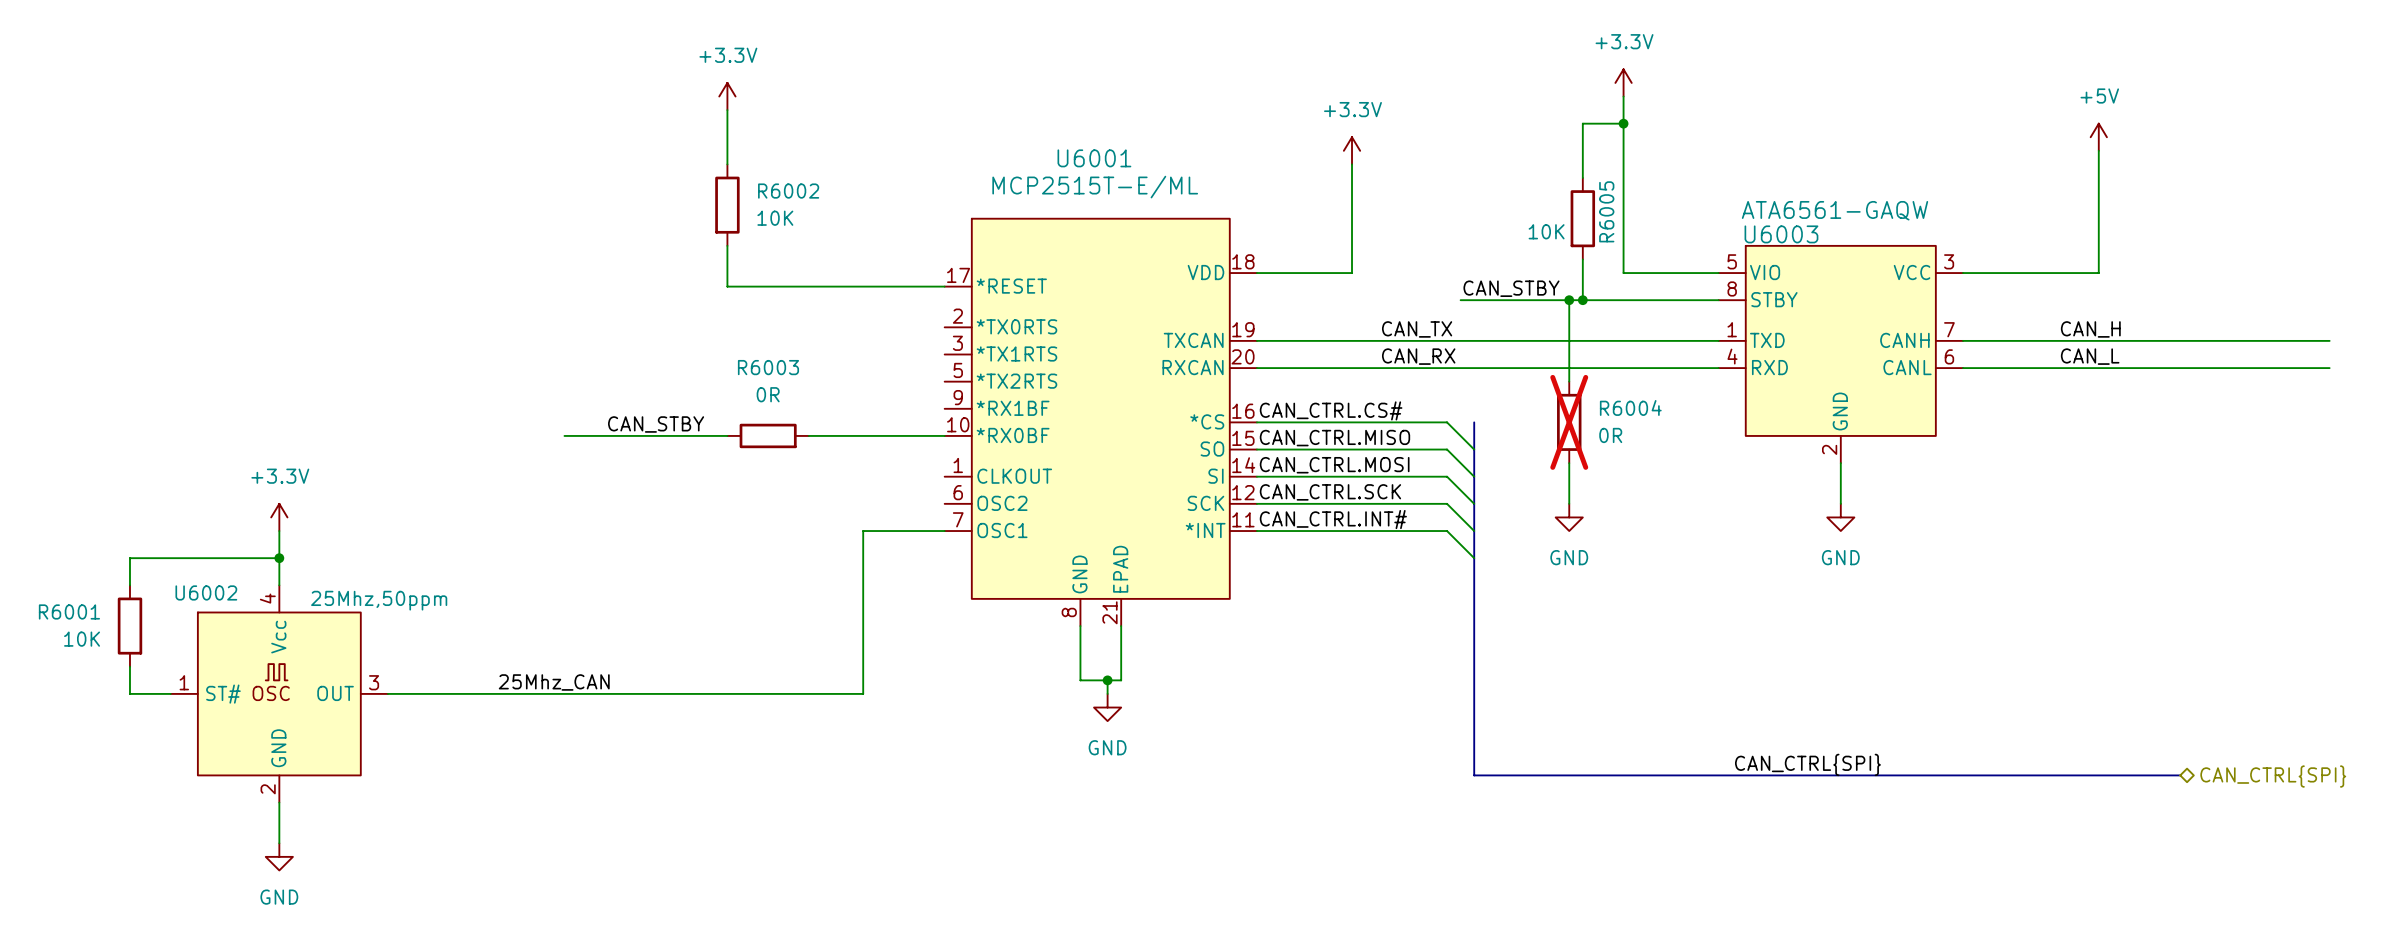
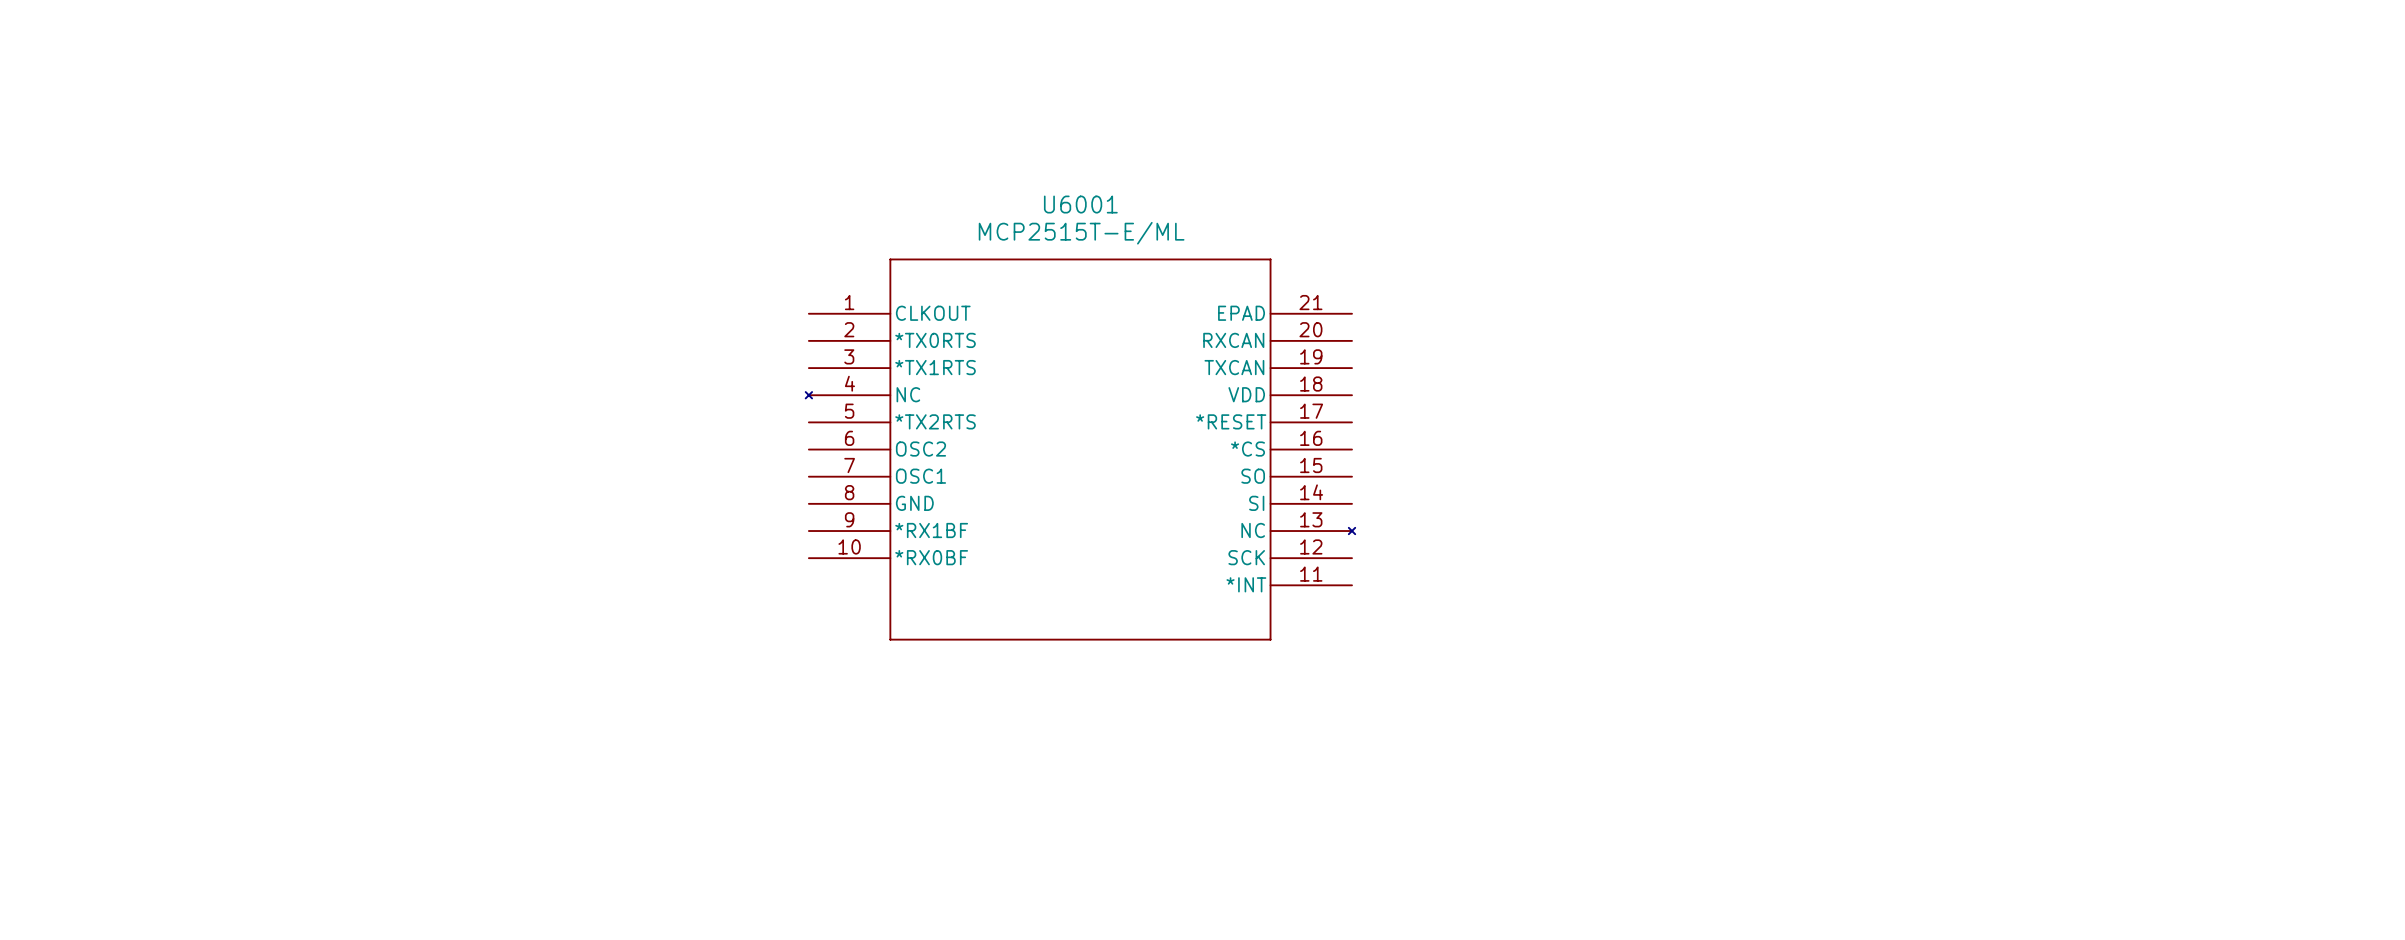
power symbol: +3.3V (1623, 82) -> none
power symbol: +3.3V (727, 96) -> none
wire: (1623, 96) (1623, 273) (1718, 273) -> none
wire: (727, 110) (727, 164) -> none
wire: (1623, 123) (1582, 123) (1582, 177) -> none
junction: (1623, 123) -> none
power symbol: +5V (2098, 137) -> none
power symbol: +3.3V (1352, 150) -> none
wire: (2098, 150) (2098, 273) (1963, 273) -> none
wire: (1352, 164) (1352, 273) (1256, 273) -> none
R6002: 10K (727, 205) -> none
U6001 symbol: [944, 218, 1257, 627] -> [805, 258, 1356, 641]
R6005: 10K (1582, 218) -> none
wire: (727, 245) (727, 286) (944, 286) -> none
wire: (1582, 259) (1582, 300) -> none
label: CAN_STBY (1511, 288) -> none
wire: (1460, 300) (1718, 300) -> none
wire: (1569, 300) (1569, 381) -> none
junction: (1569, 300) -> none
junction: (1582, 300) -> none
label: CAN_TX (1417, 329) -> none
label: CAN_H (2090, 329) -> none
wire: (1256, 340) (1718, 340) -> none
wire: (1963, 340) (2329, 340) -> none
U6003: ATA6561-GAQW (1840, 354) -> none
label: CAN_RX (1418, 356) -> none
label: CAN_L (2090, 356) -> none
wire: (1256, 368) (1718, 368) -> none
wire: (1963, 368) (2329, 368) -> none
label: CAN_CTRL.CS# (1331, 410) -> none
wire: (1256, 422) (1447, 422) (1474, 449) -> none
bus: (1474, 422) (1474, 775) (2180, 775) -> none
R6004: 0R (1569, 422) -> none
label: CAN_STBY (656, 424) -> none
wire: (564, 435) (727, 435) -> none
R6003: 0R (768, 435) -> none
wire: (808, 435) (944, 435) -> none
label: CAN_CTRL.MISO (1334, 438) -> none
wire: (1256, 449) (1447, 449) (1474, 476) -> none
wire: (1569, 463) (1569, 503) -> none
wire: (1840, 463) (1840, 503) -> none
label: CAN_CTRL.MOSI (1334, 465) -> none
wire: (1256, 476) (1447, 476) (1474, 503) -> none
label: CAN_CTRL.SCK (1330, 492) -> none
wire: (1256, 503) (1447, 503) (1474, 531) -> none
power symbol: +3.3V (279, 517) -> none
power symbol: GND (1569, 517) -> none
power symbol: GND (1840, 517) -> none
label: CAN_CTRL.INT# (1333, 519) -> none
wire: (279, 531) (279, 585) -> none
wire: (944, 531) (863, 531) (863, 693) (387, 693) -> none
wire: (1256, 531) (1447, 531) (1474, 558) -> none
wire: (279, 558) (129, 558) (129, 585) -> none
junction: (279, 558) -> none
R6001: 10K (129, 626) -> none
wire: (1080, 626) (1080, 680) (1121, 680) (1121, 626) -> none
wire: (129, 666) (129, 693) (170, 693) -> none
wire: (1107, 680) (1107, 693) -> none
junction: (1107, 680) -> none
label: 25Mhz_CAN (554, 682) -> none
U6002: 25Mhz,50ppm (279, 693) -> none
power symbol: GND (1107, 707) -> none
label: CAN_CTRL{SPI} (1807, 764) -> none
hierarchical label: CAN_CTRL{SPI} (2273, 776) -> none
wire: (279, 802) (279, 843) -> none
power symbol: GND (279, 856) -> none

